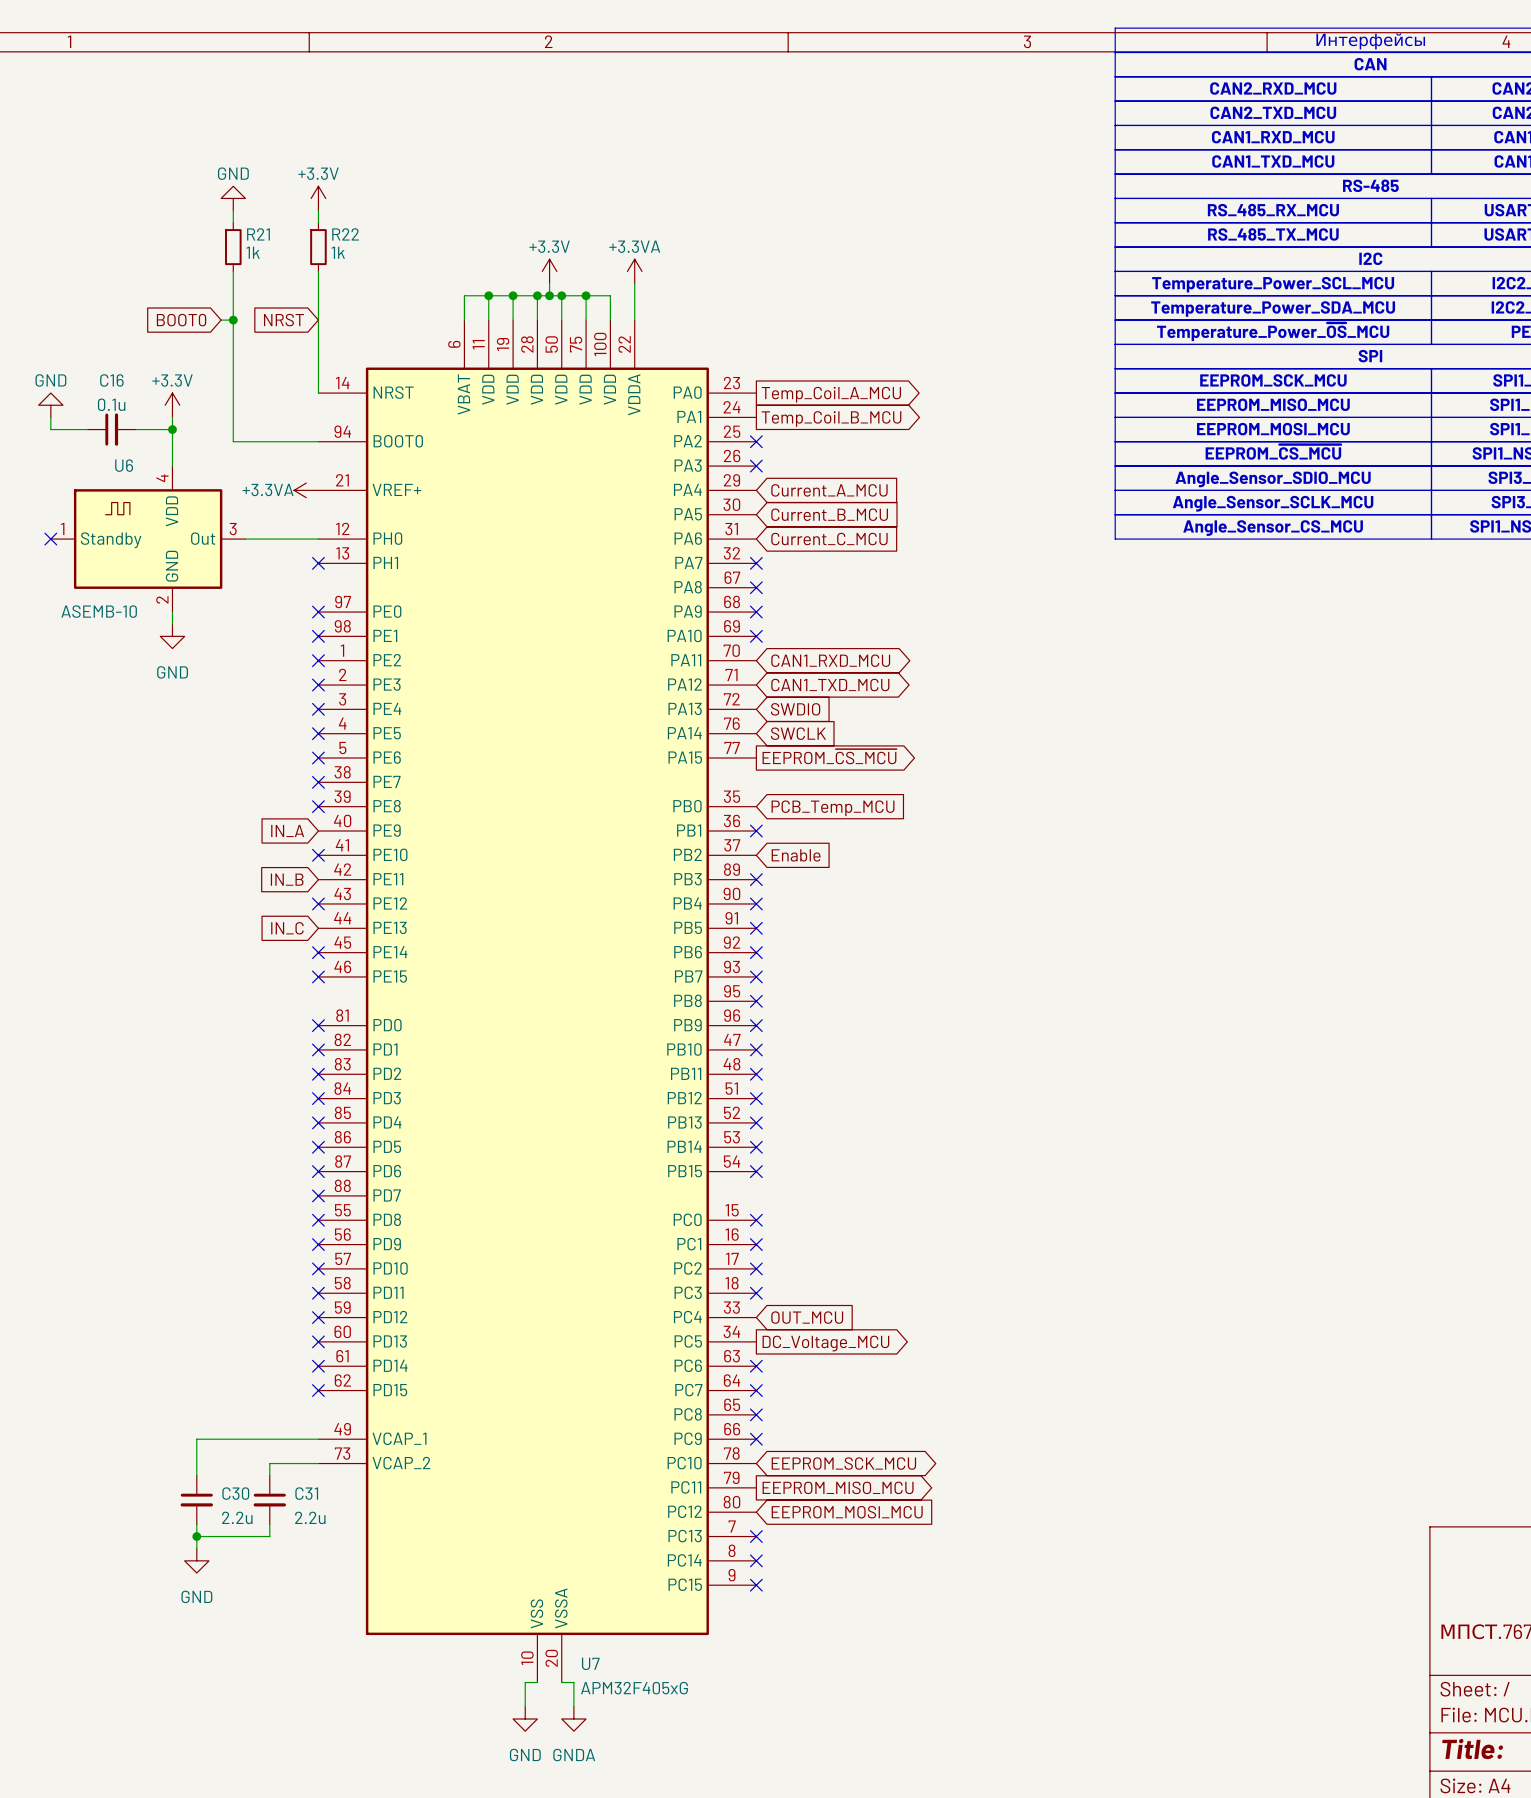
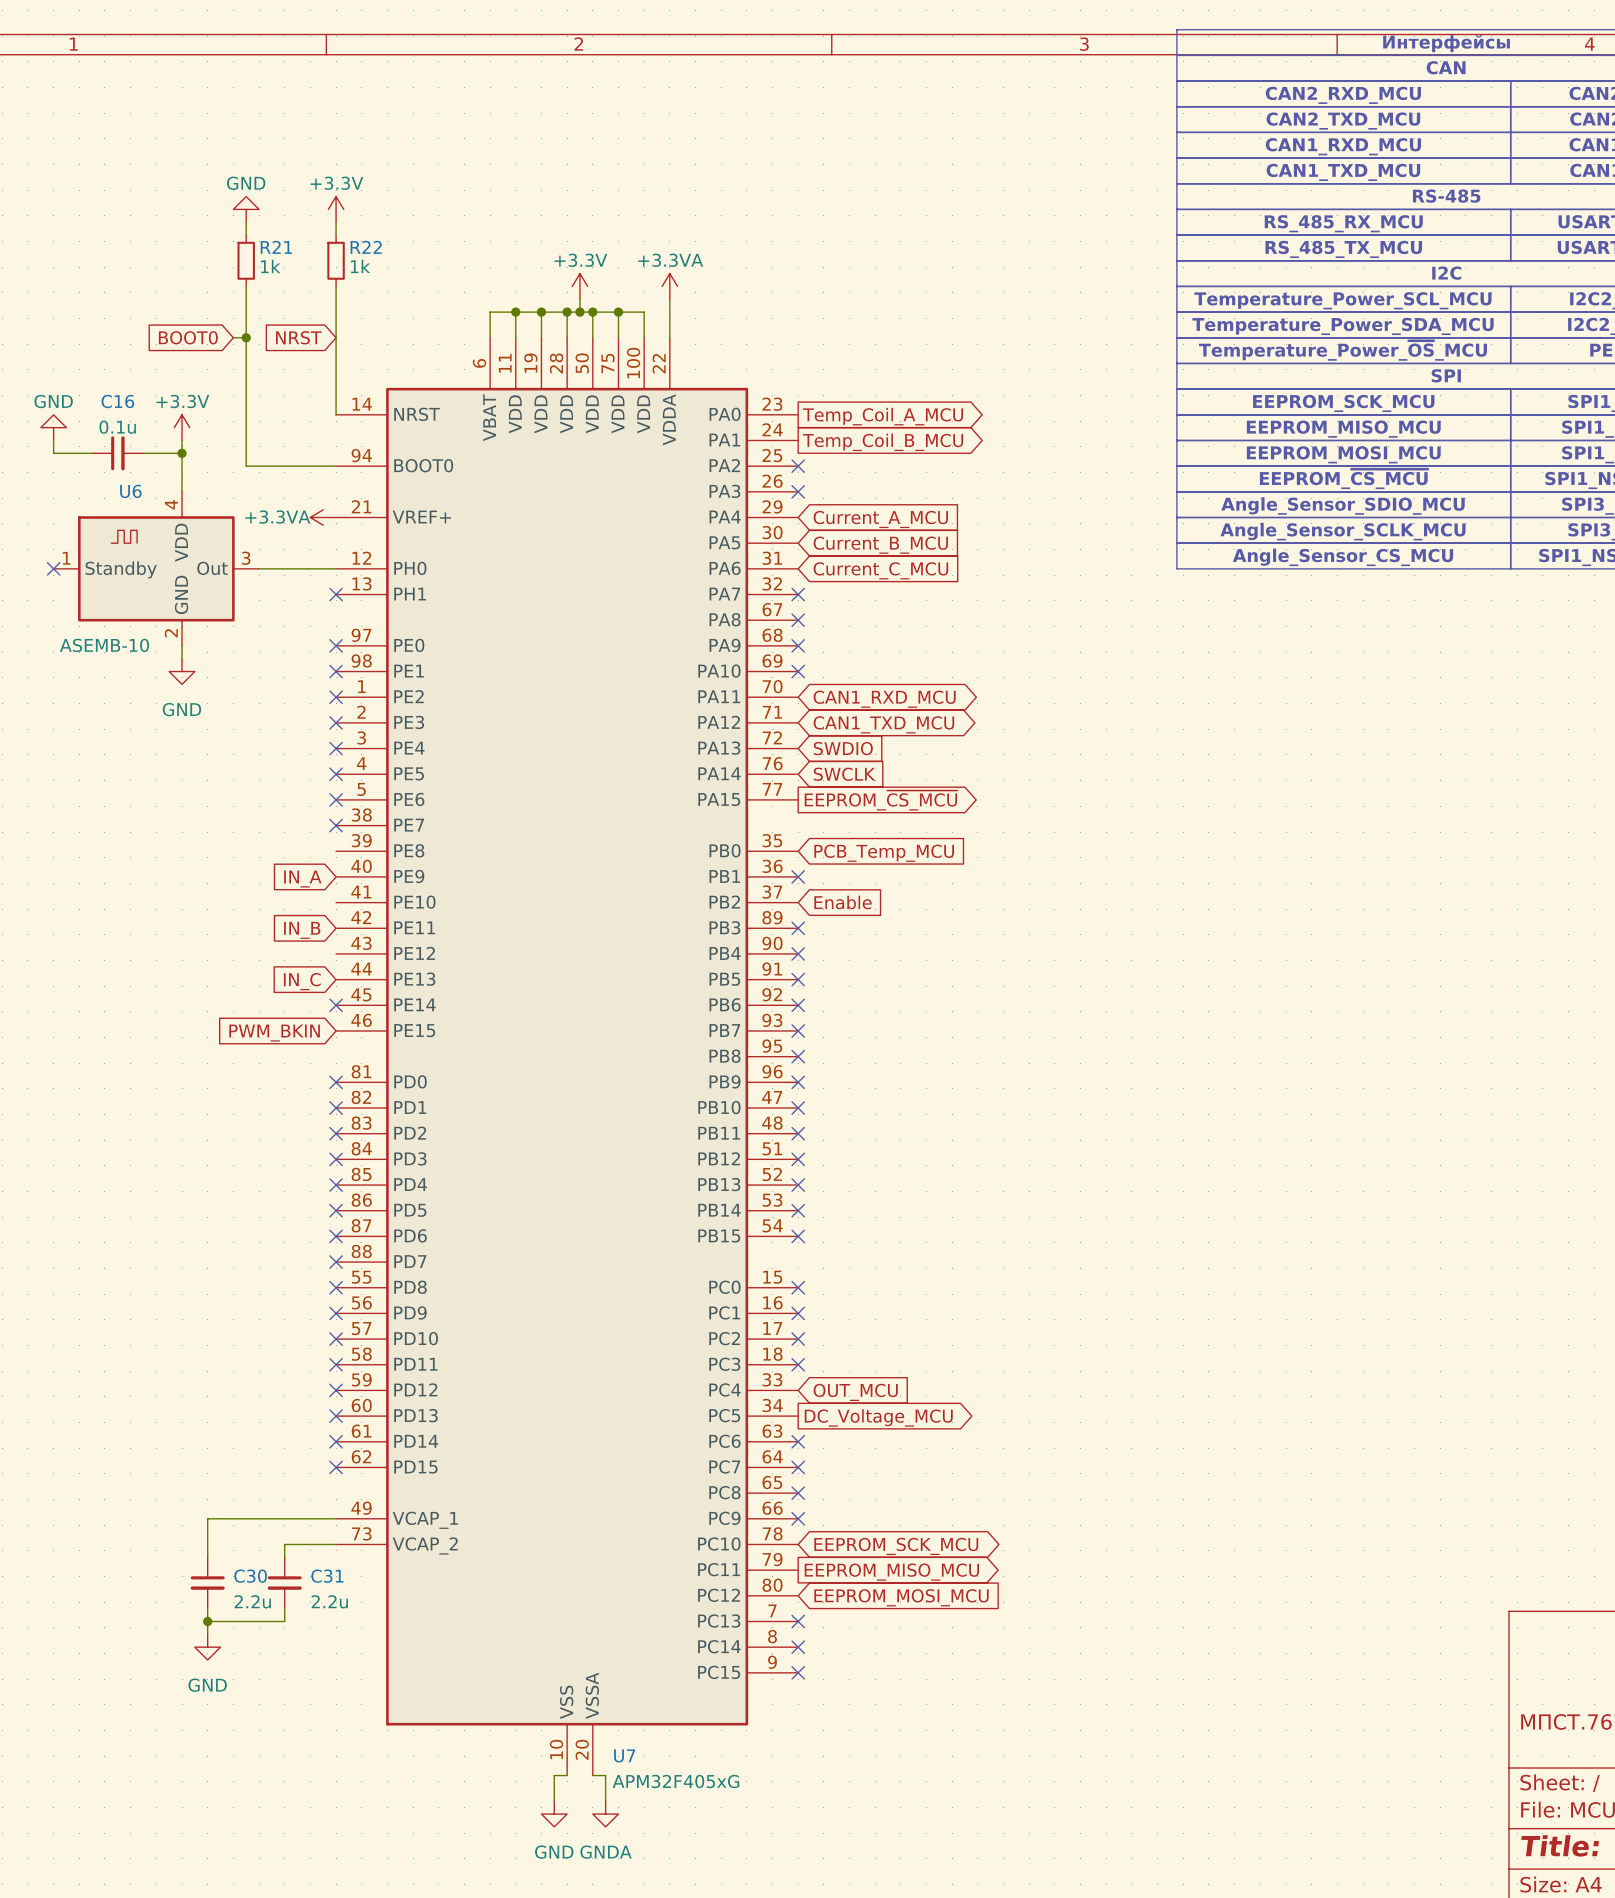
no-connect mark: (318, 806) -> none
no-connect mark: (318, 855) -> none
no-connect mark: (318, 903) -> none
global label: none -> PWM_BKIN (274, 1033)
no-connect mark: (318, 976) -> none

